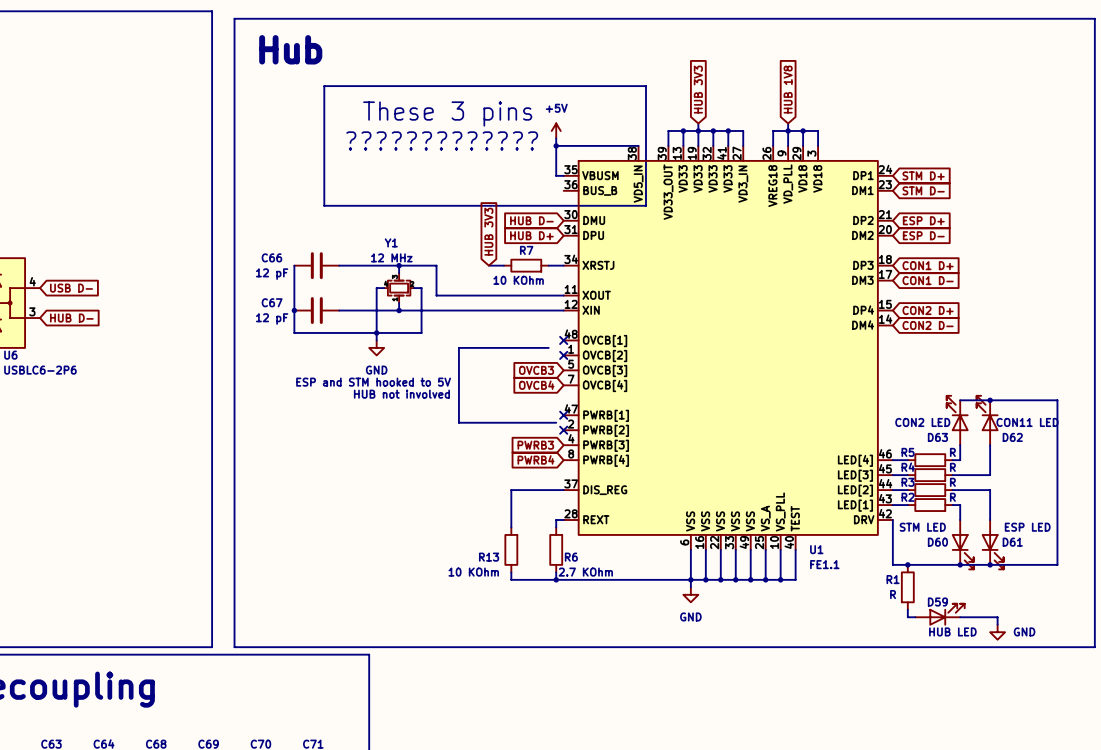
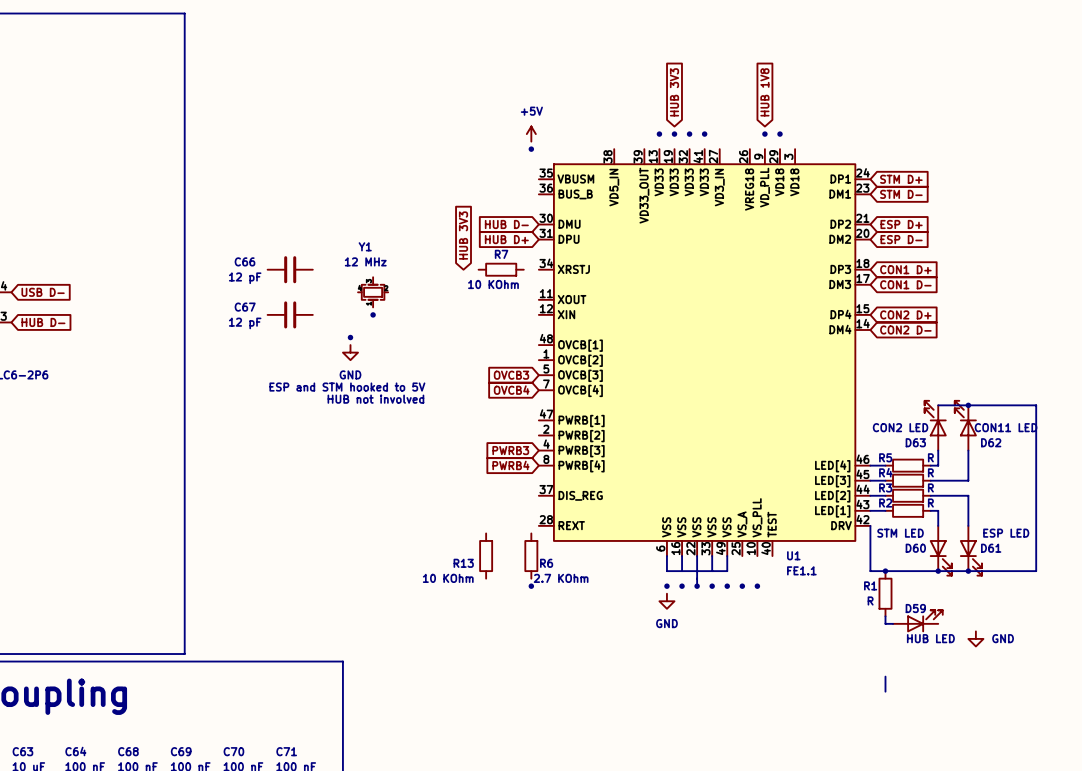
line: (234, 18) (1094, 18) (1094, 647) (234, 647) (234, 18) -> none
text: Hub (290, 49) -> none
line: (324, 86) (645, 86) (645, 205) (324, 205) (324, 86) -> none
text: These 3 pins (447, 113) -> none
wire: (698, 123) (698, 145) -> none
wire: (788, 123) (788, 145) -> none
wire: (683, 130) (683, 145) -> none
wire: (713, 130) (713, 145) -> none
wire: (728, 130) (728, 145) -> none
wire: (803, 130) (803, 145) -> none
wire: (556, 138) (556, 175) (563, 175) -> none
text: ????????????? (442, 140) -> none
wire: (556, 145) (638, 145) -> none
wire: (668, 145) (668, 130) (743, 130) (743, 145) -> none
wire: (773, 145) (773, 130) (818, 130) (818, 145) -> none
wire: (294, 265) (294, 332) (421, 332) (421, 288) (414, 288) -> none
wire: (339, 265) (436, 265) (436, 295) (563, 295) -> none
wire: (399, 265) (399, 273) -> none
junction: (399, 265) -> none
wire: (488, 265) (503, 265) -> none
wire: (548, 265) (563, 265) -> none
wire: (384, 288) (376, 288) (376, 340) -> none
wire: (399, 303) (399, 310) -> none
junction: (294, 310) -> none
wire: (339, 310) (563, 310) -> none
no-connect mark: (563, 340) -> none
line: (548, 347) (458, 347) (458, 422) (556, 422) -> none
no-connect mark: (563, 355) -> none
no-connect mark: (563, 415) -> none
no-connect mark: (563, 430) -> none
wire: (563, 490) (511, 490) (511, 527) -> none
wire: (563, 520) (556, 520) (556, 527) -> none
wire: (765, 549) (765, 579) -> none
wire: (780, 549) (780, 579) -> none
wire: (795, 549) (795, 579) (511, 579) (511, 572) -> none
wire: (690, 564) (690, 587) -> none
wire: (705, 564) (705, 579) -> none
wire: (735, 564) (735, 579) -> none
wire: (750, 564) (750, 579) -> (727, 571) (666, 571)
wire: (556, 572) (556, 579) -> none
wire: (960, 617) (997, 617) (997, 624) -> none
wire: none -> (885, 676) (885, 691)

